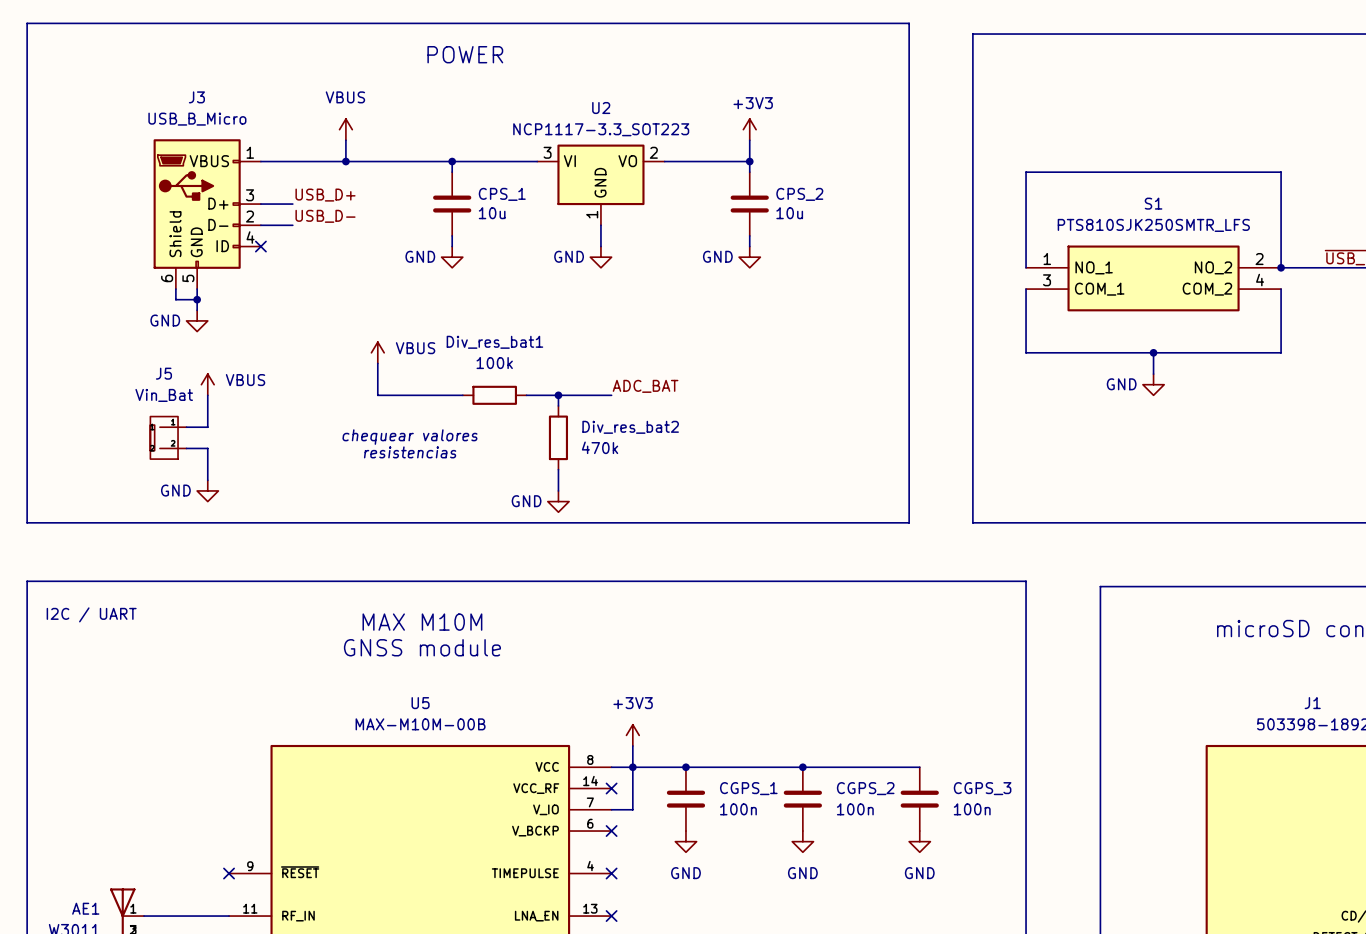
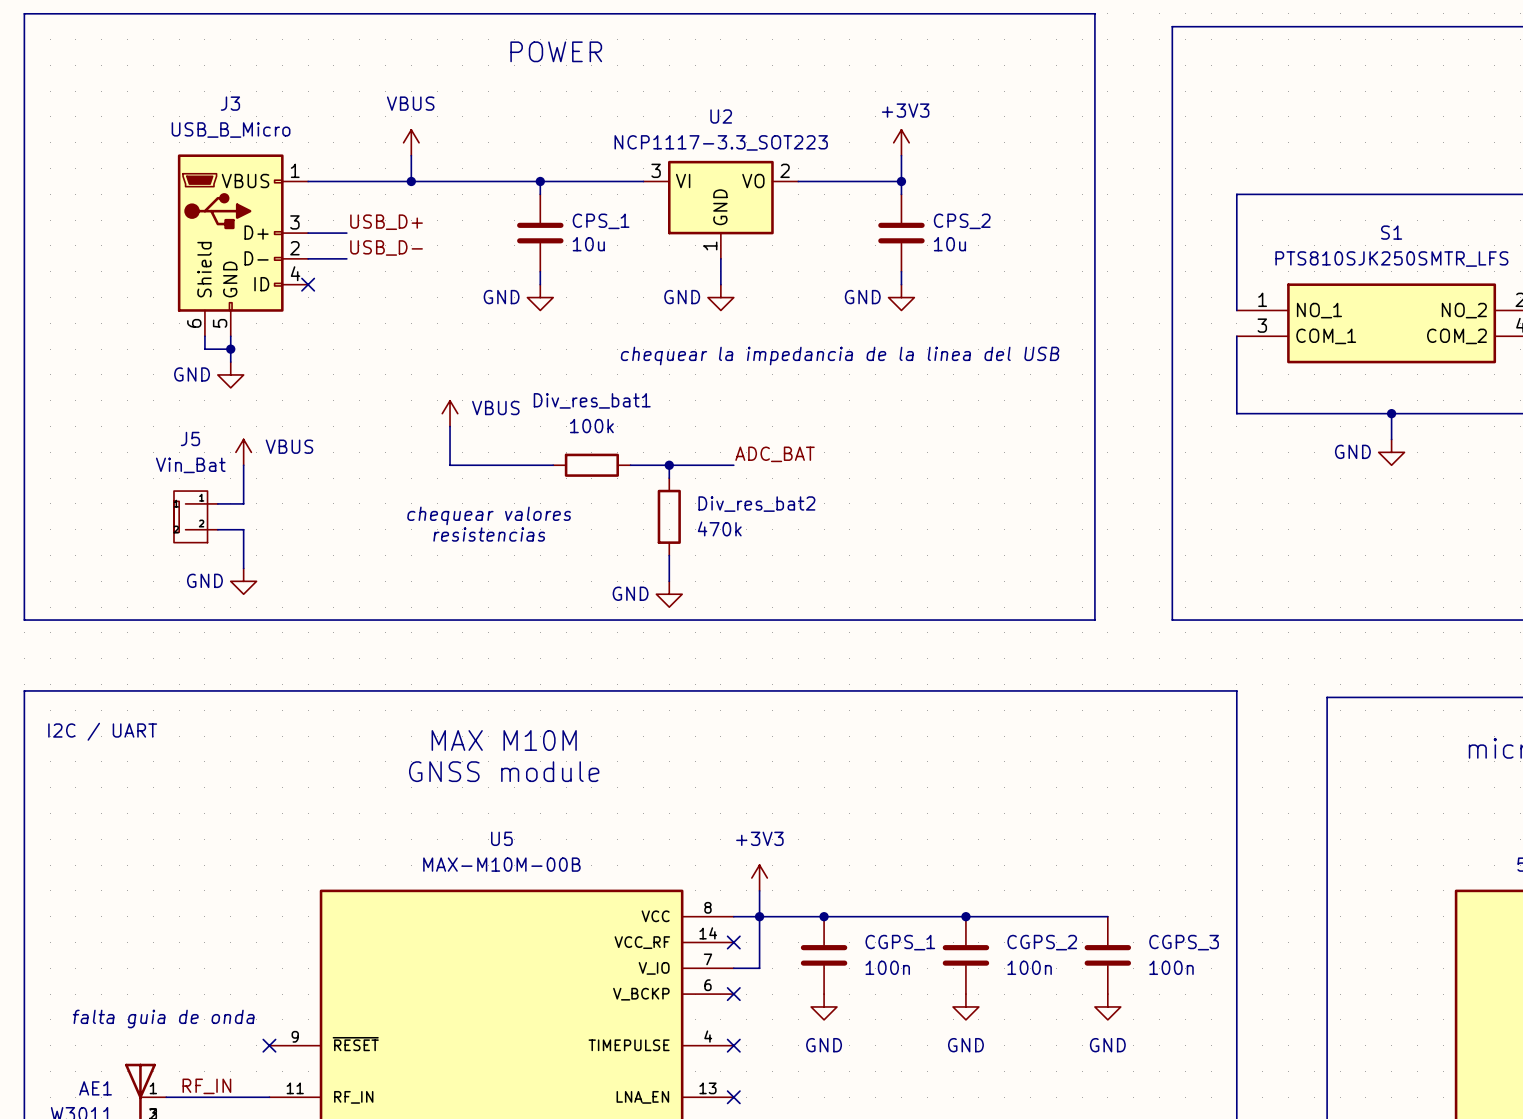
text: none -> chequear la impedancia de la linea del USB (840, 356)
text: none -> falta guia de onda (163, 1019)
label: none -> RF_IN (206, 1086)

